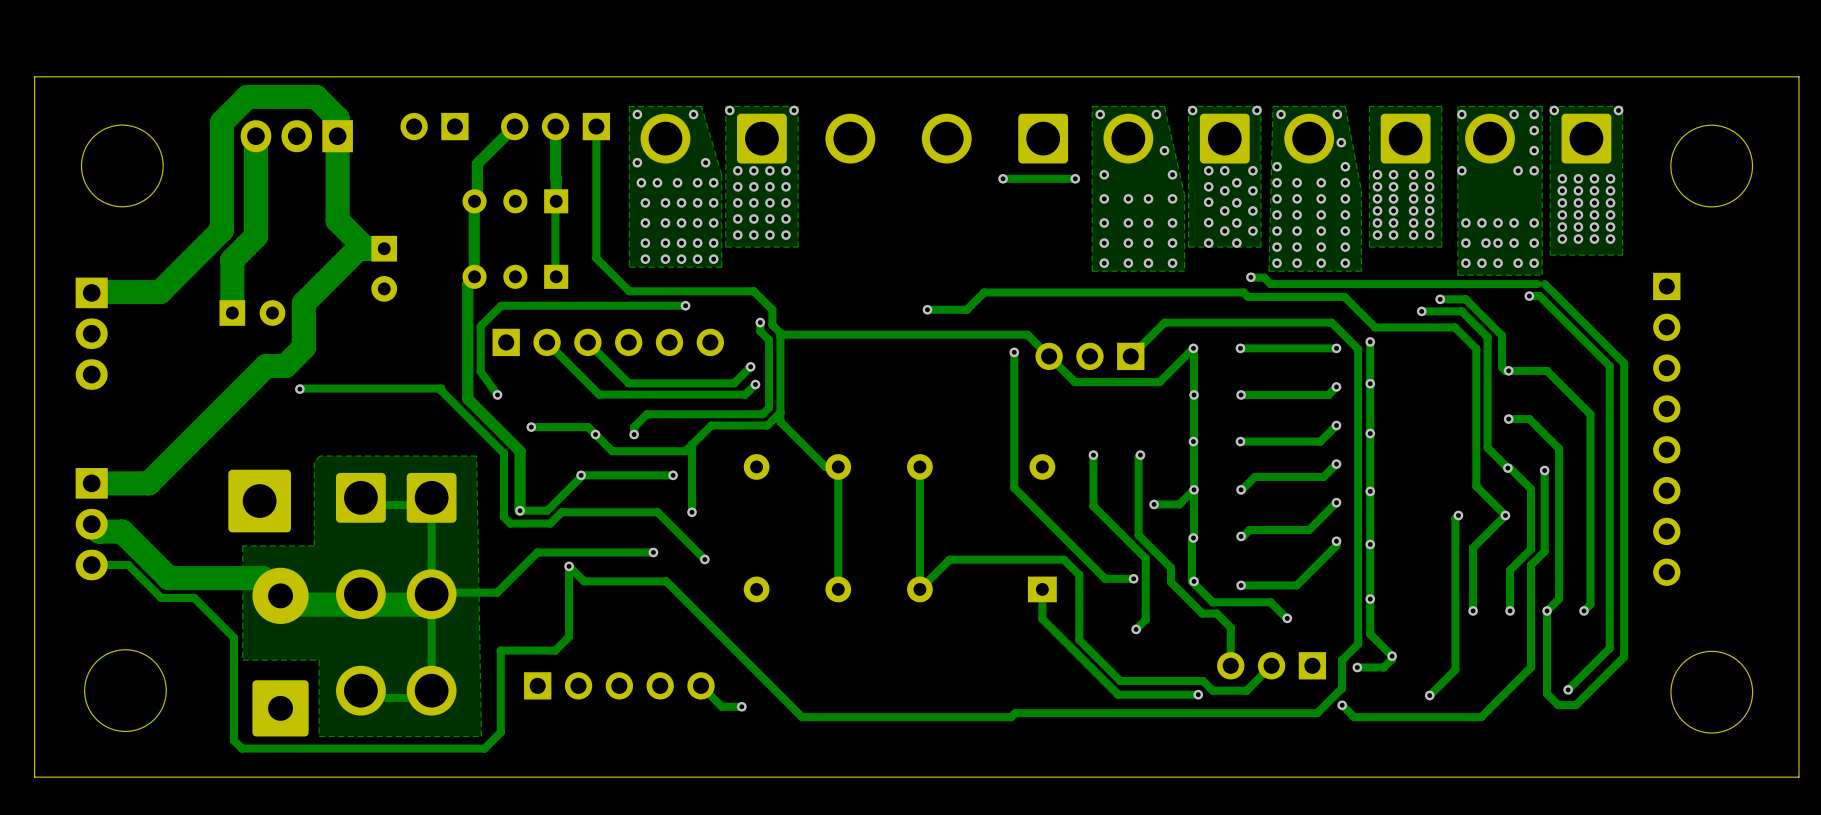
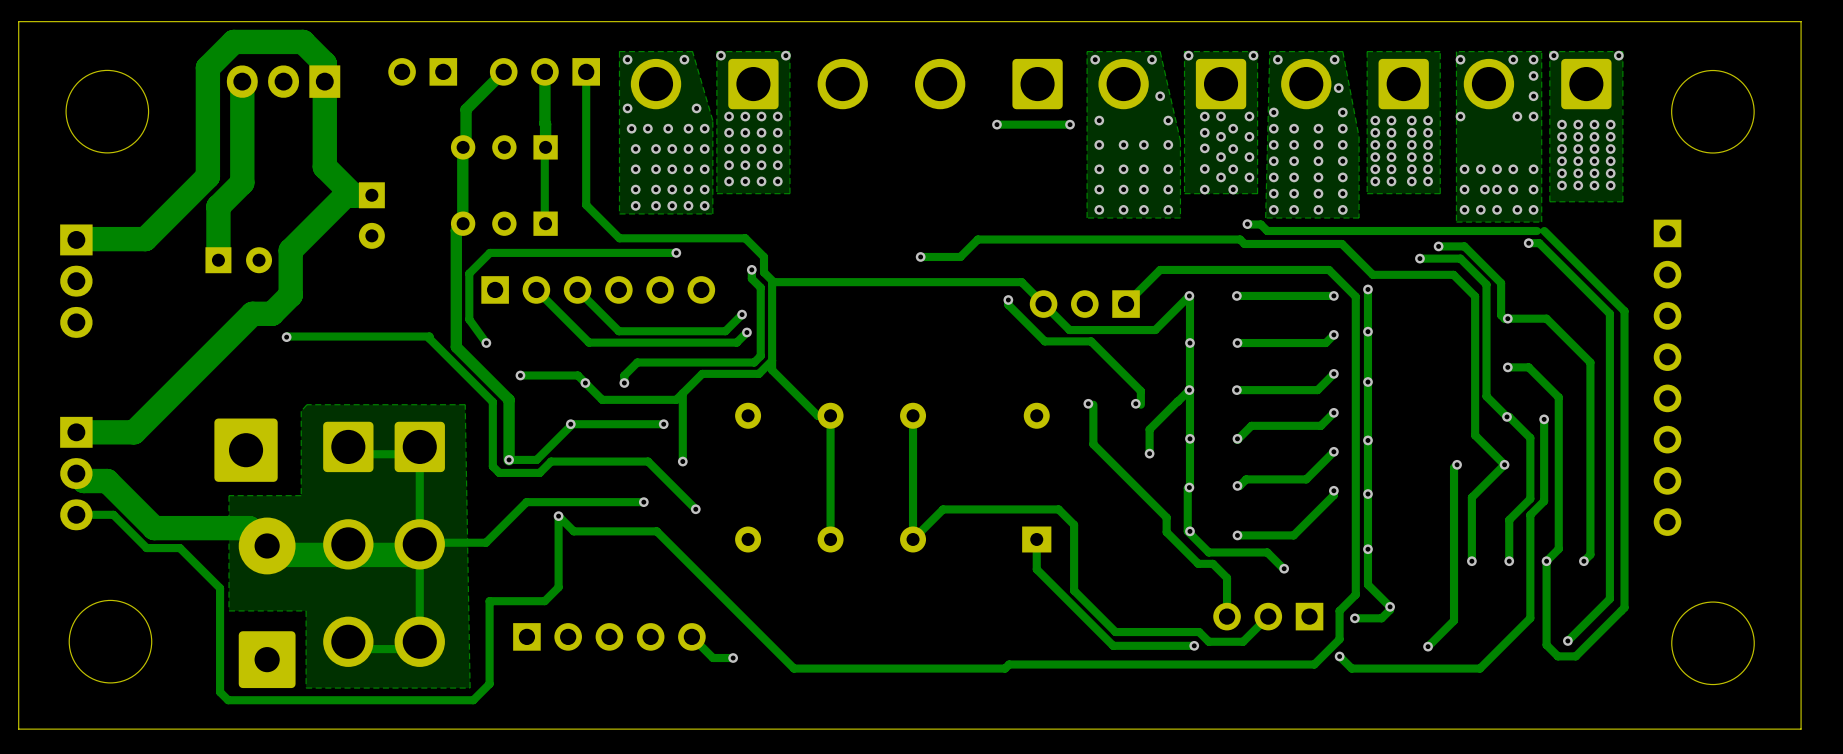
track: (1014, 357) (1014, 487) (1105, 578) (1133, 578) -> (1008, 304) (1044, 341) (1091, 341) (1140, 391) (1140, 404)
track: (1093, 455) (1093, 506) (1145, 558) (1145, 619) (1136, 629) -> none
track: (1140, 455) (1138, 456) (1138, 535) -> (1093, 404) (1093, 444) (1133, 484)
track: (1194, 489) (1179, 504) (1154, 504) -> (1189, 390) (1149, 429) (1149, 453)
via: (1133, 578) -> none
via: (1136, 629) -> none

